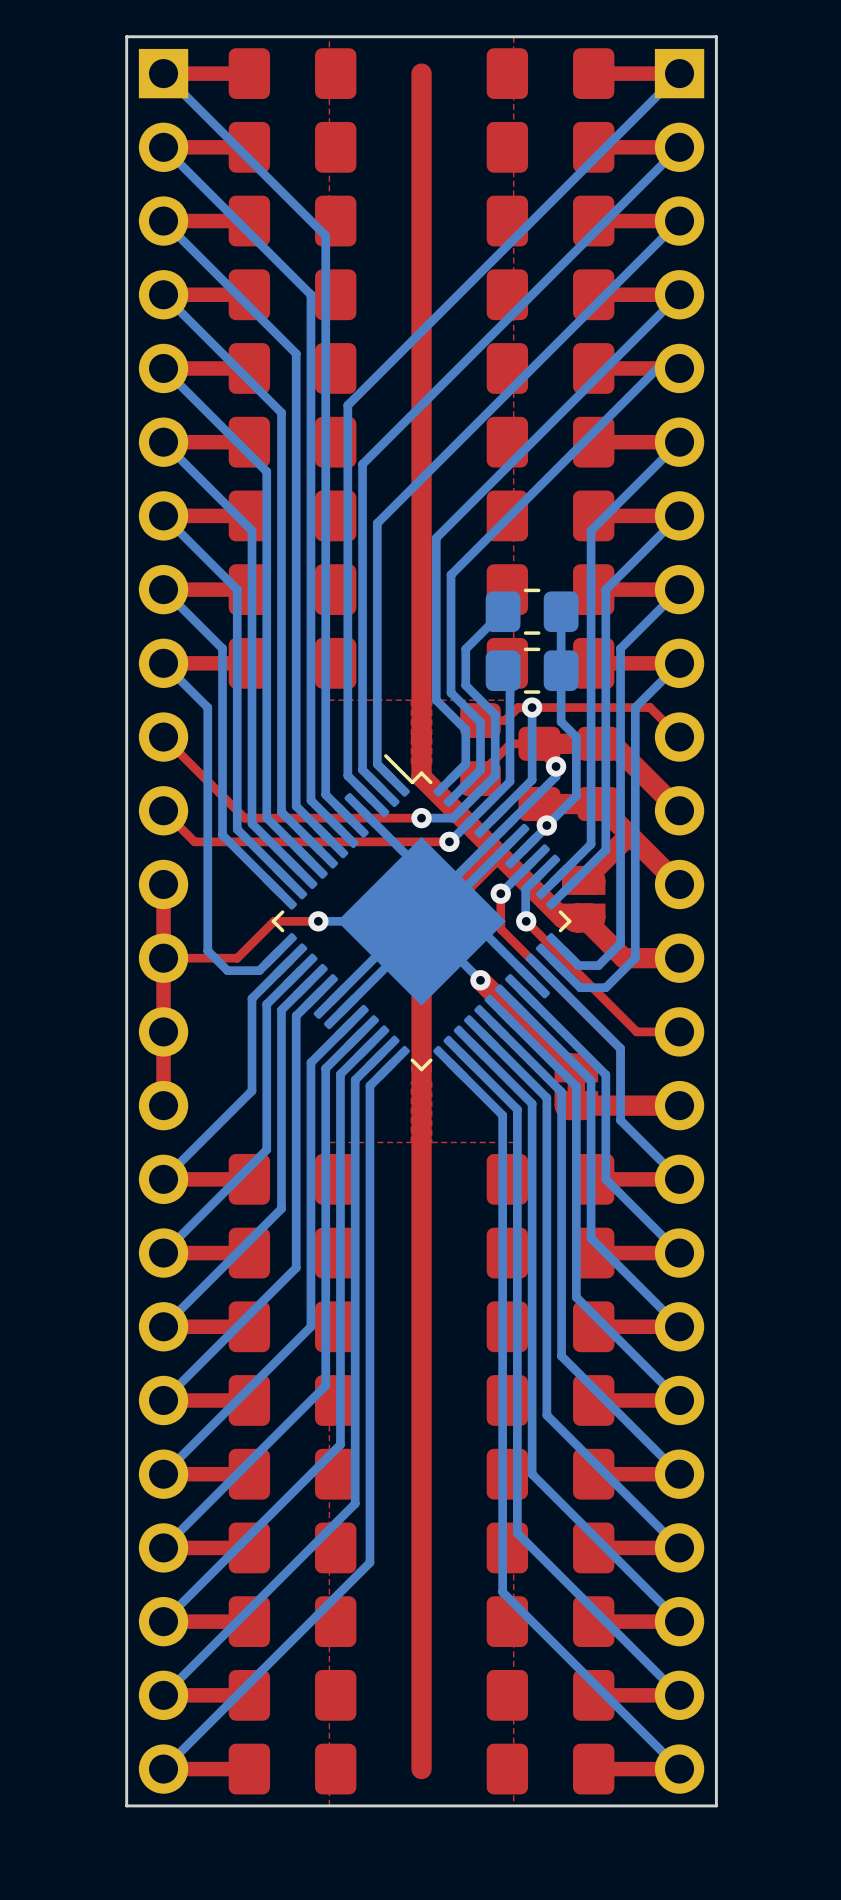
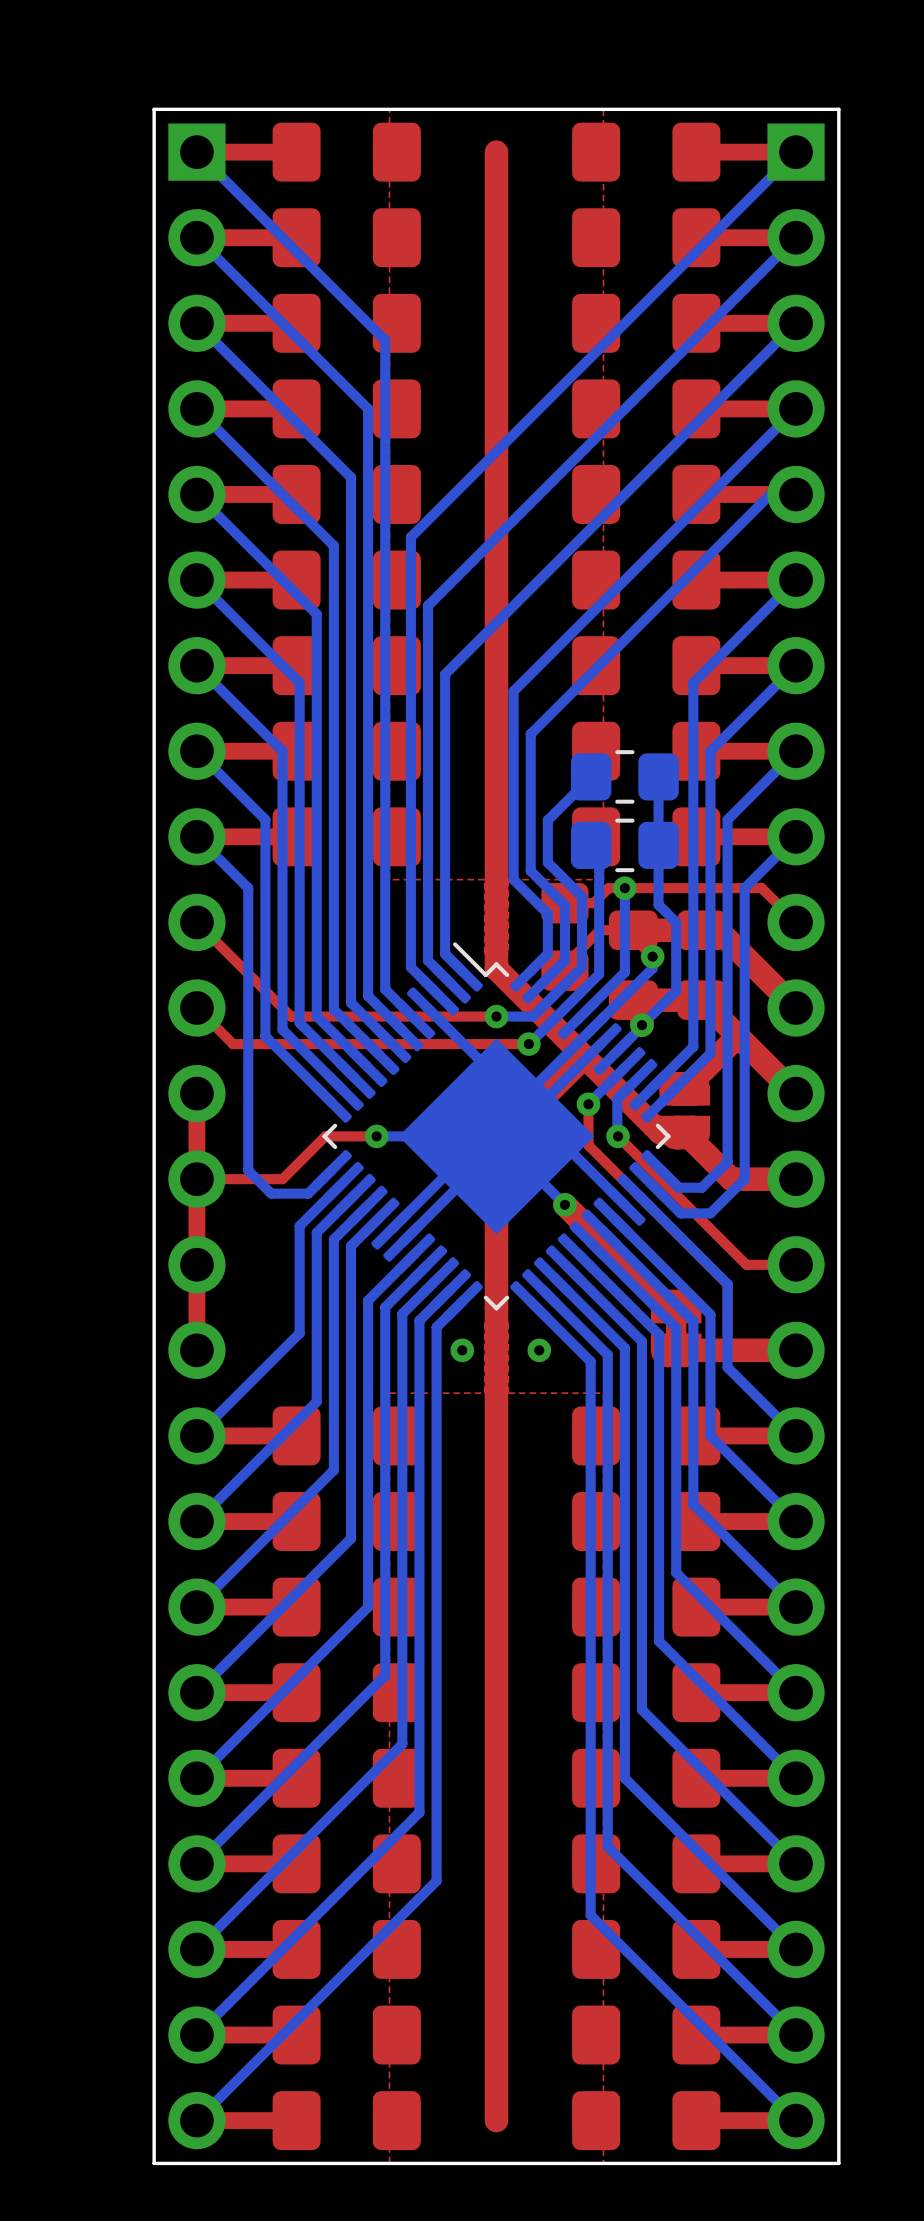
via: none -> (462, 1350)
via: none -> (539, 1350)

